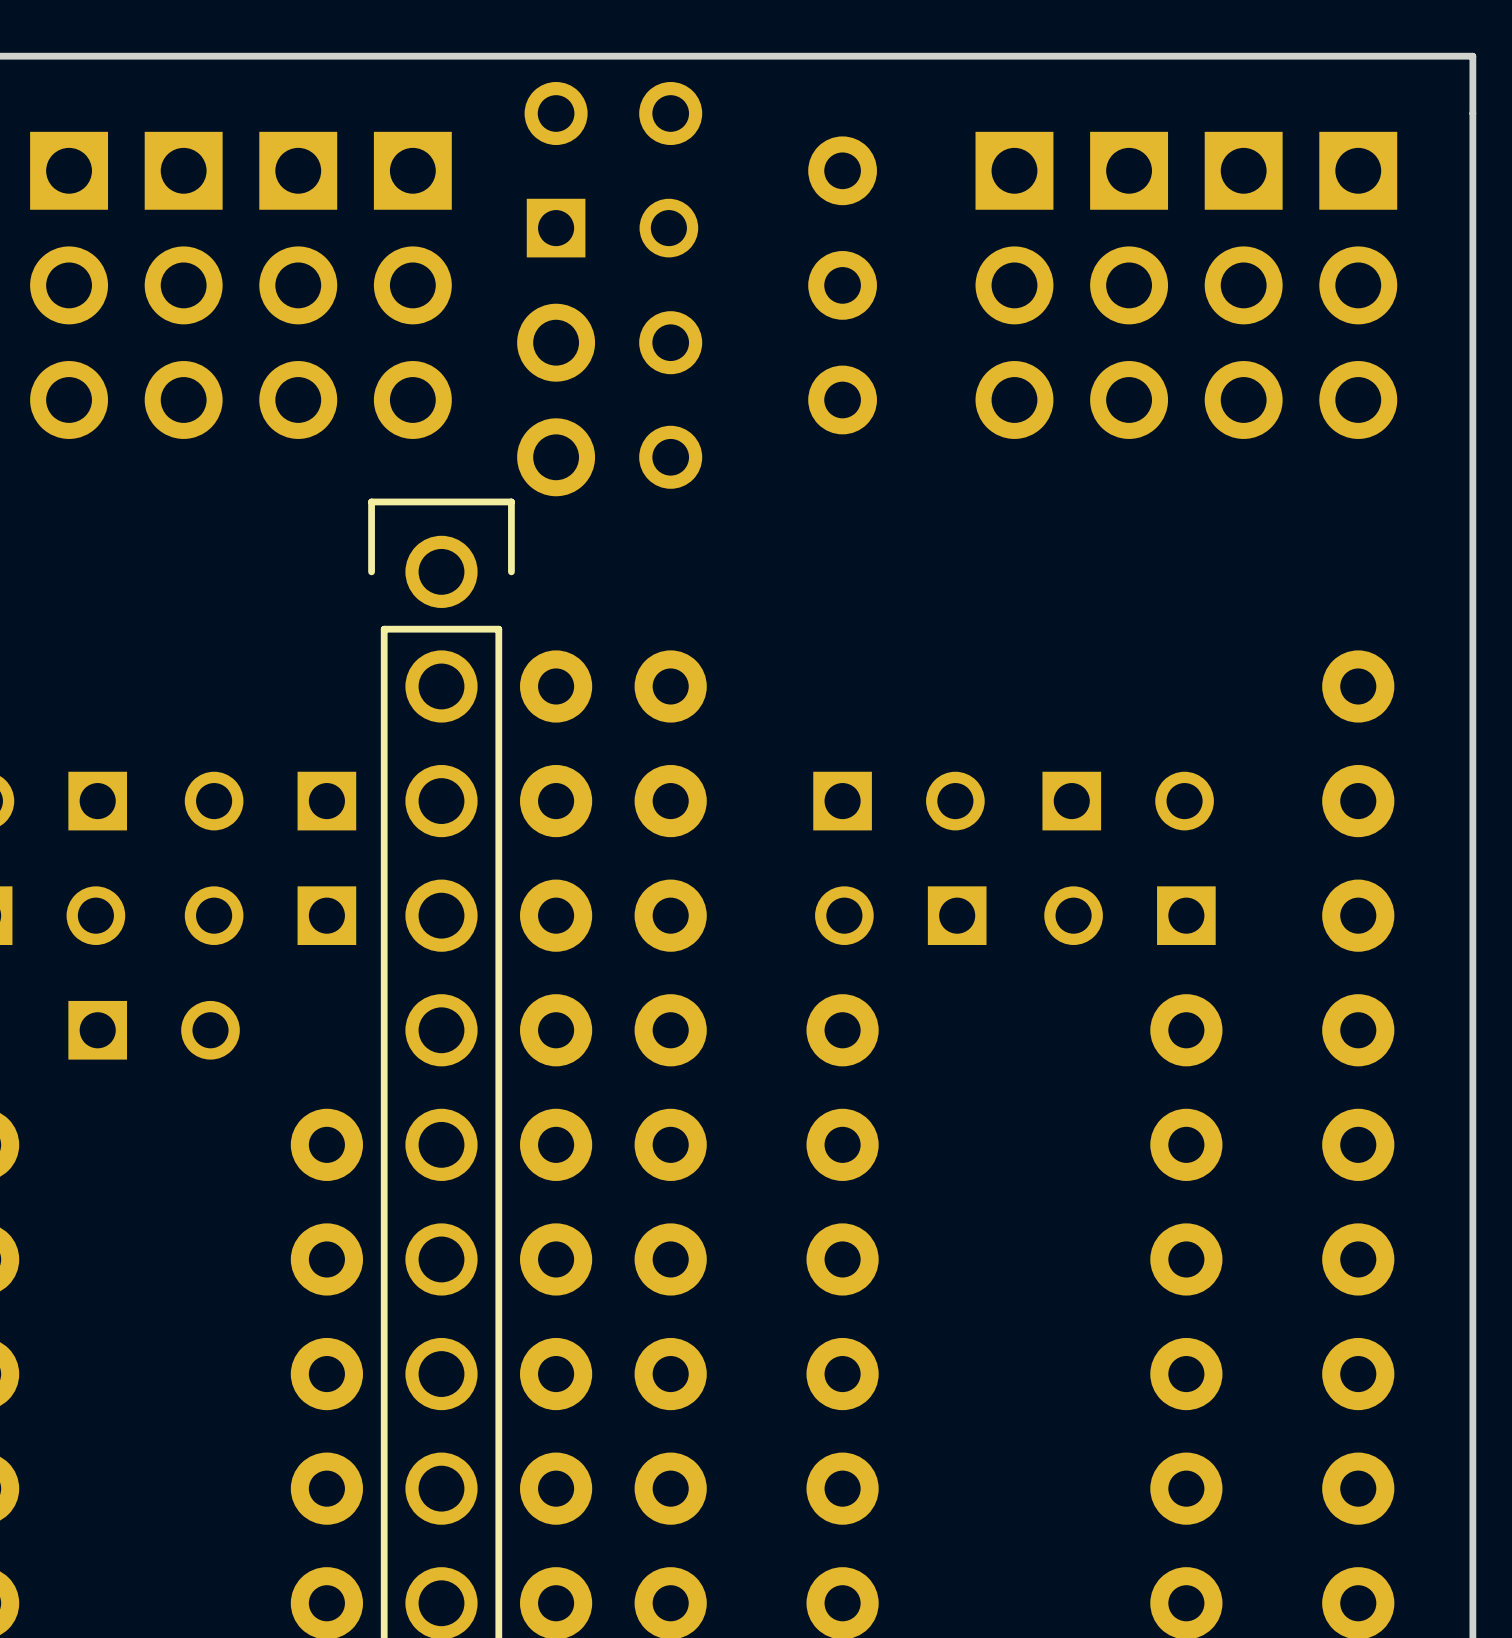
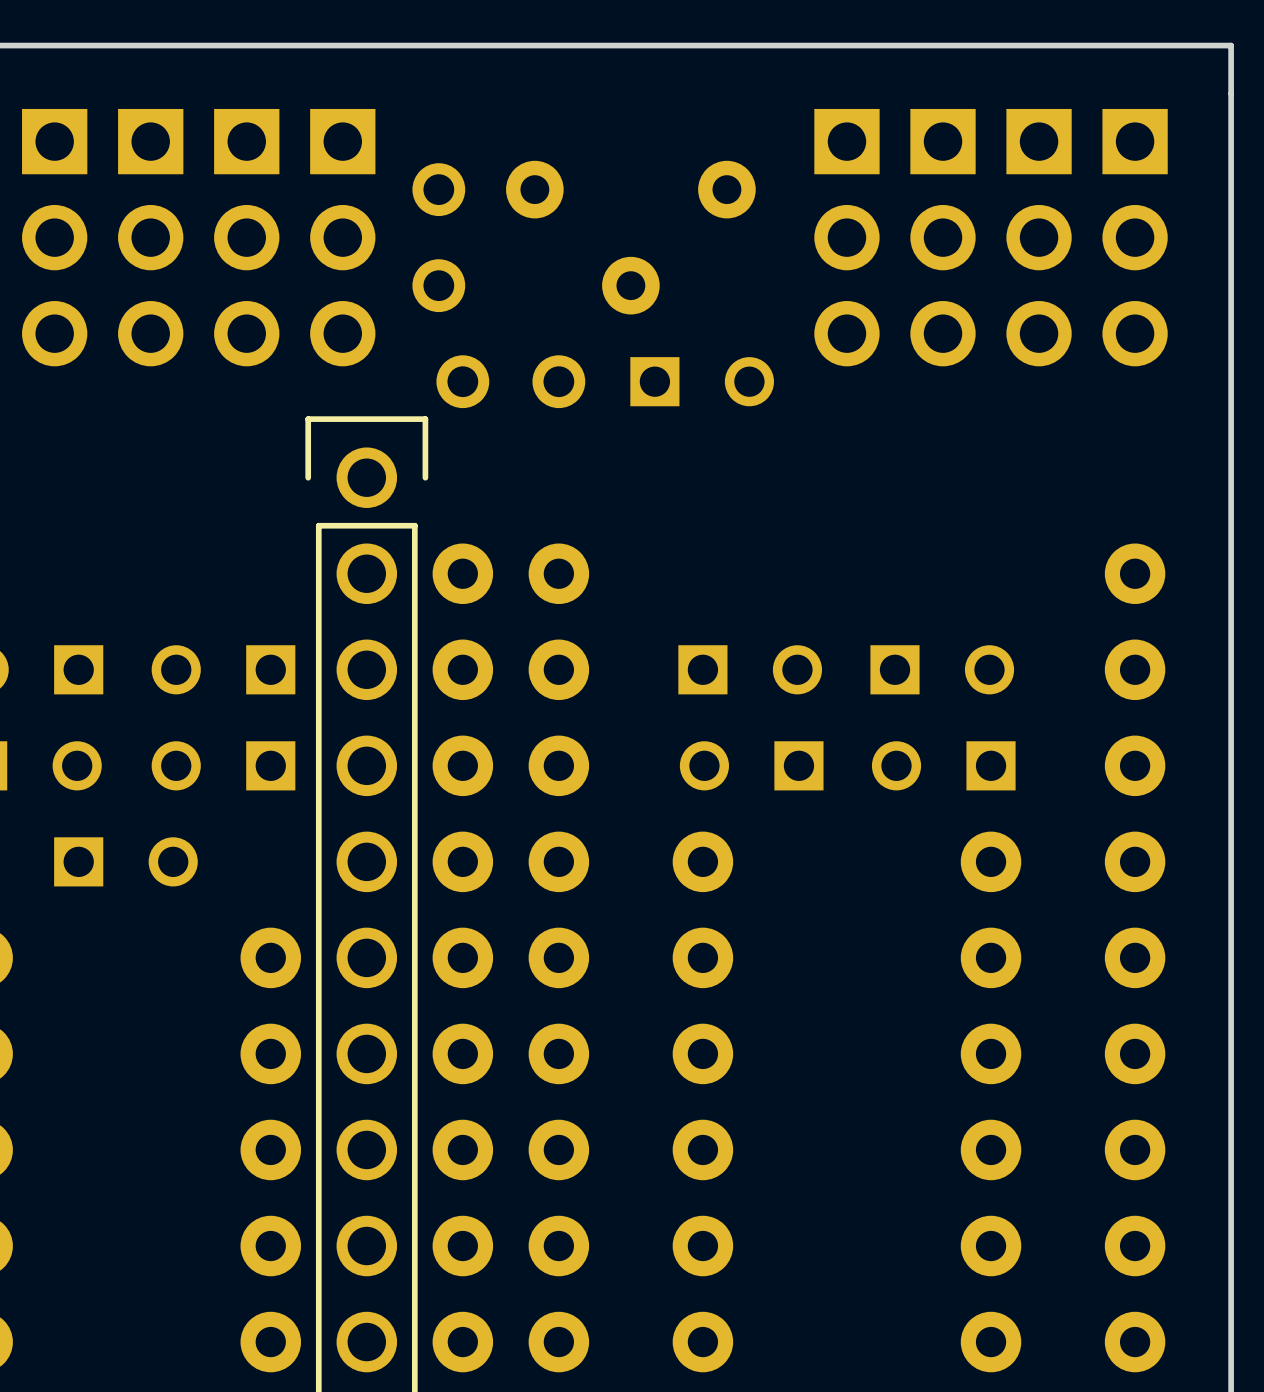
part: (613, 113) -> none
part position: (612, 228) -> (702, 381)
part: none -> (438, 237)
part: none -> (630, 237)
part: (842, 285) -> none
part: (556, 399) -> none
part rotation: 0° (670, 399) -> 90° clockwise (510, 381)

